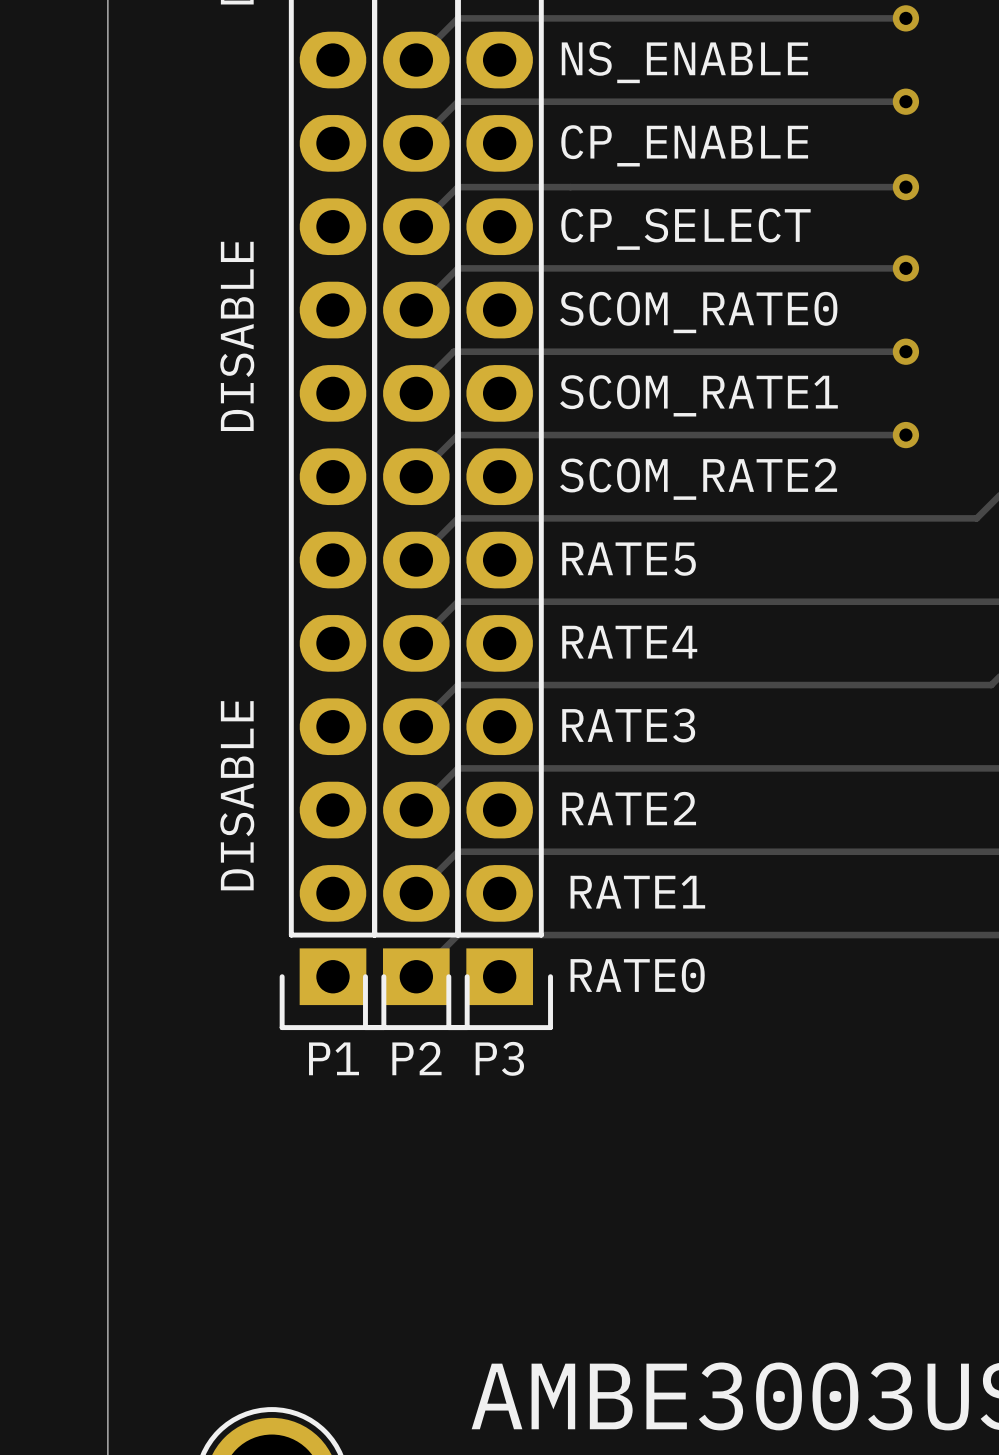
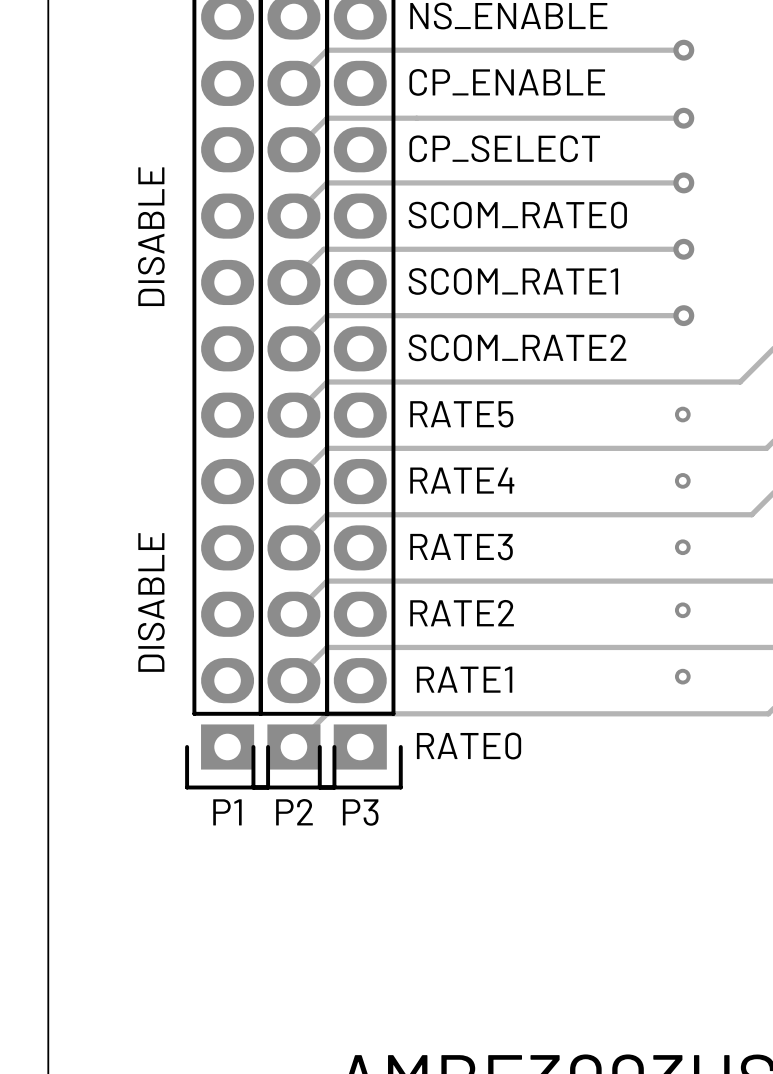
part: none -> (682, 414)
part: none -> (682, 480)
part: none -> (682, 547)
part: none -> (682, 610)
part: none -> (682, 676)

